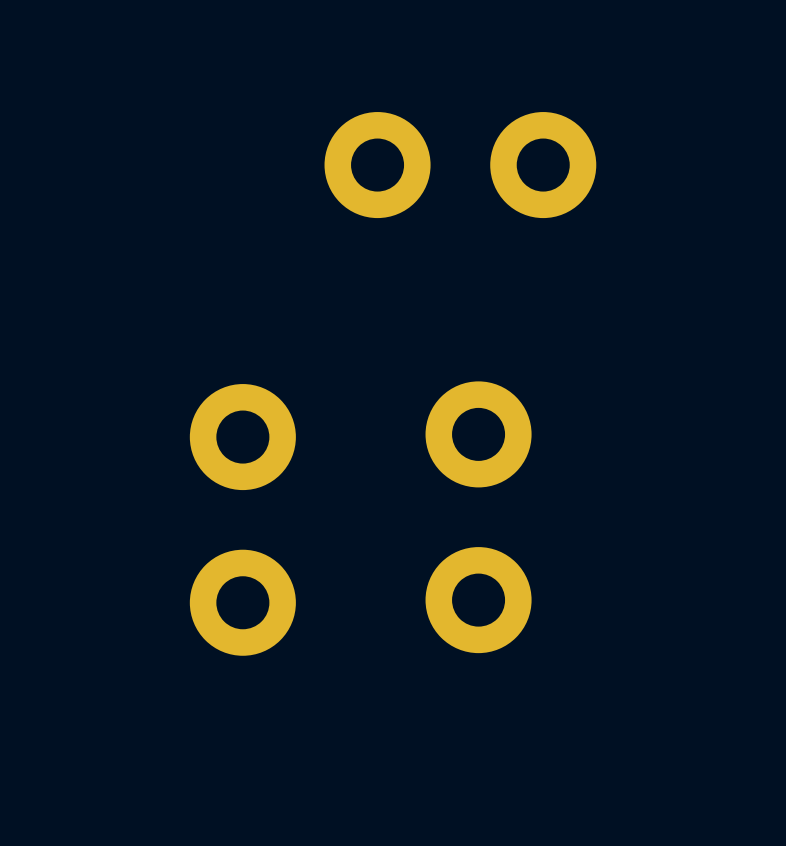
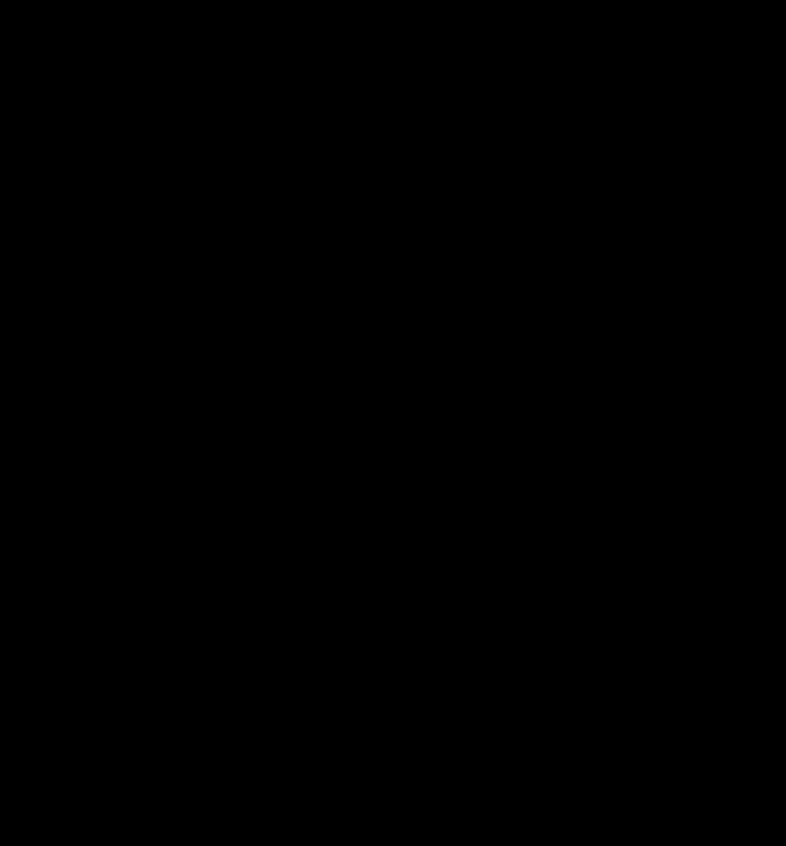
part: (460, 165) -> none
part: (478, 517) -> none
part: (242, 519) -> none

